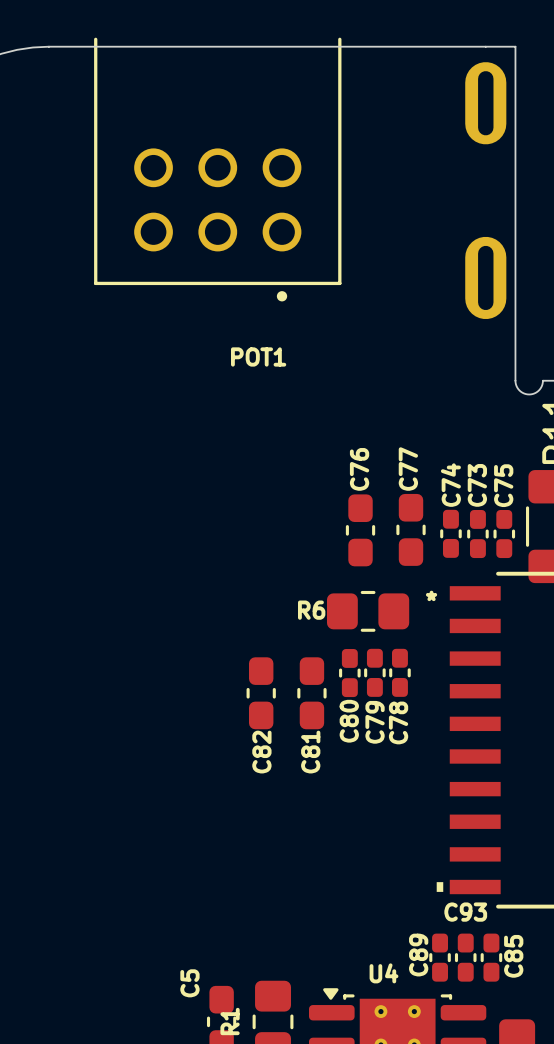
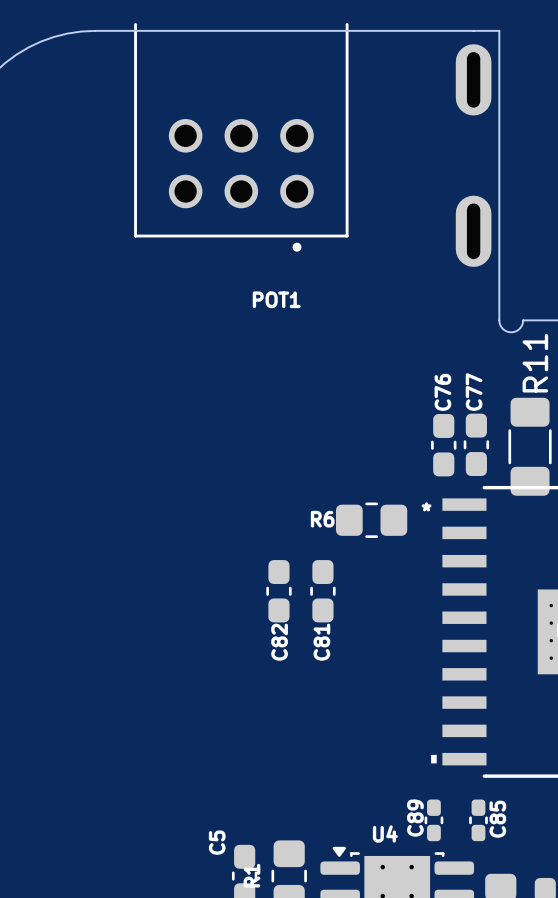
C77 position: (411, 529) -> (476, 444)
C76 position: (360, 530) -> (443, 445)
C74: (450, 533) -> none
C73: (477, 534) -> none
C75: (504, 534) -> none
C79: (374, 672) -> none
C78: (399, 672) -> none
C80: (349, 673) -> none
C93: (465, 957) -> none

